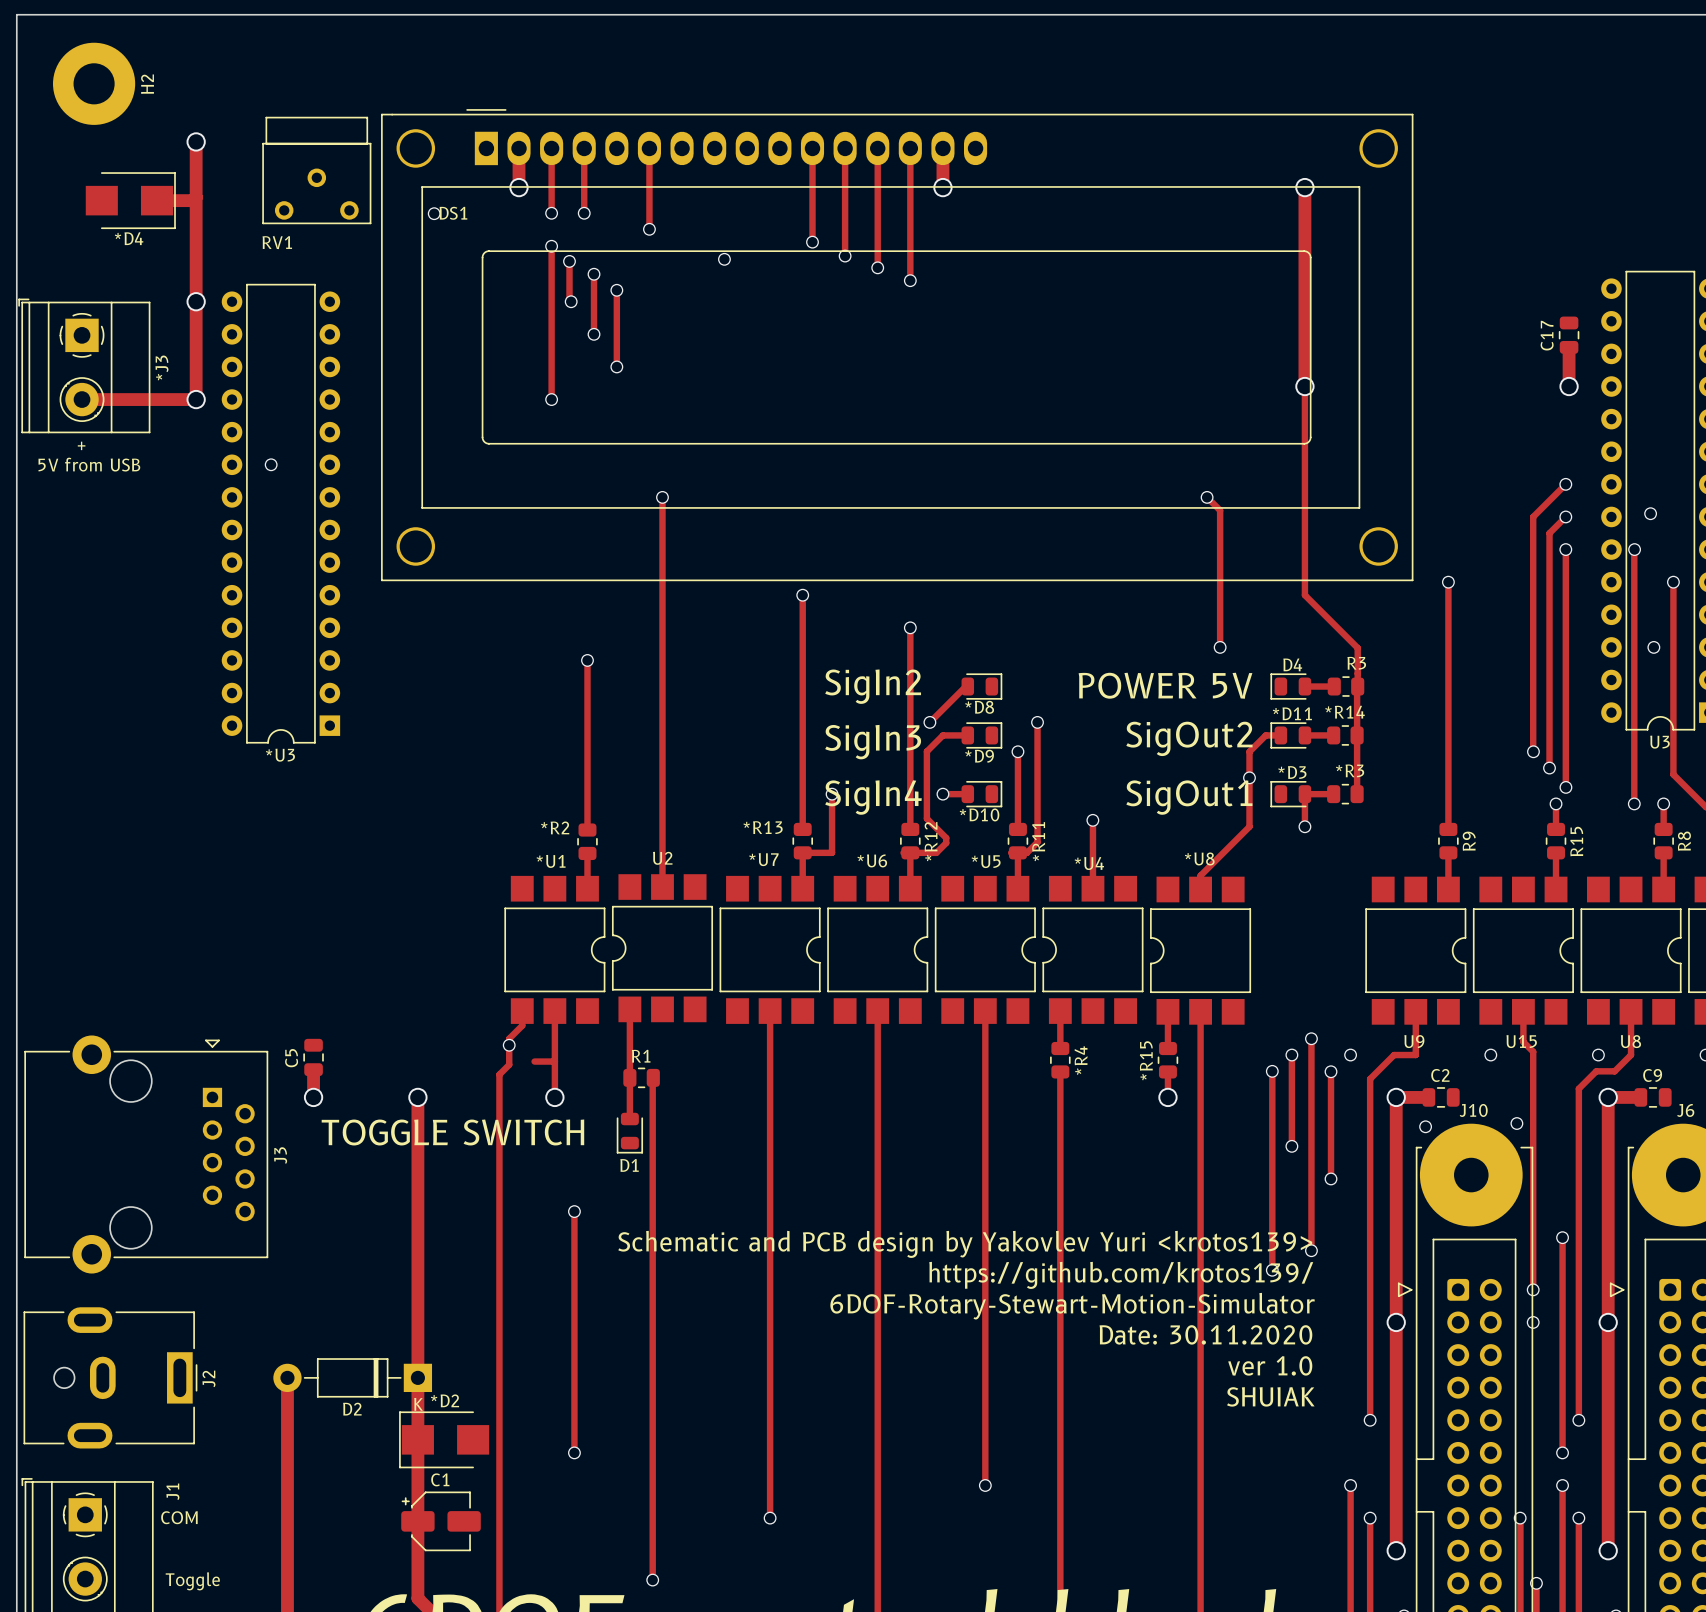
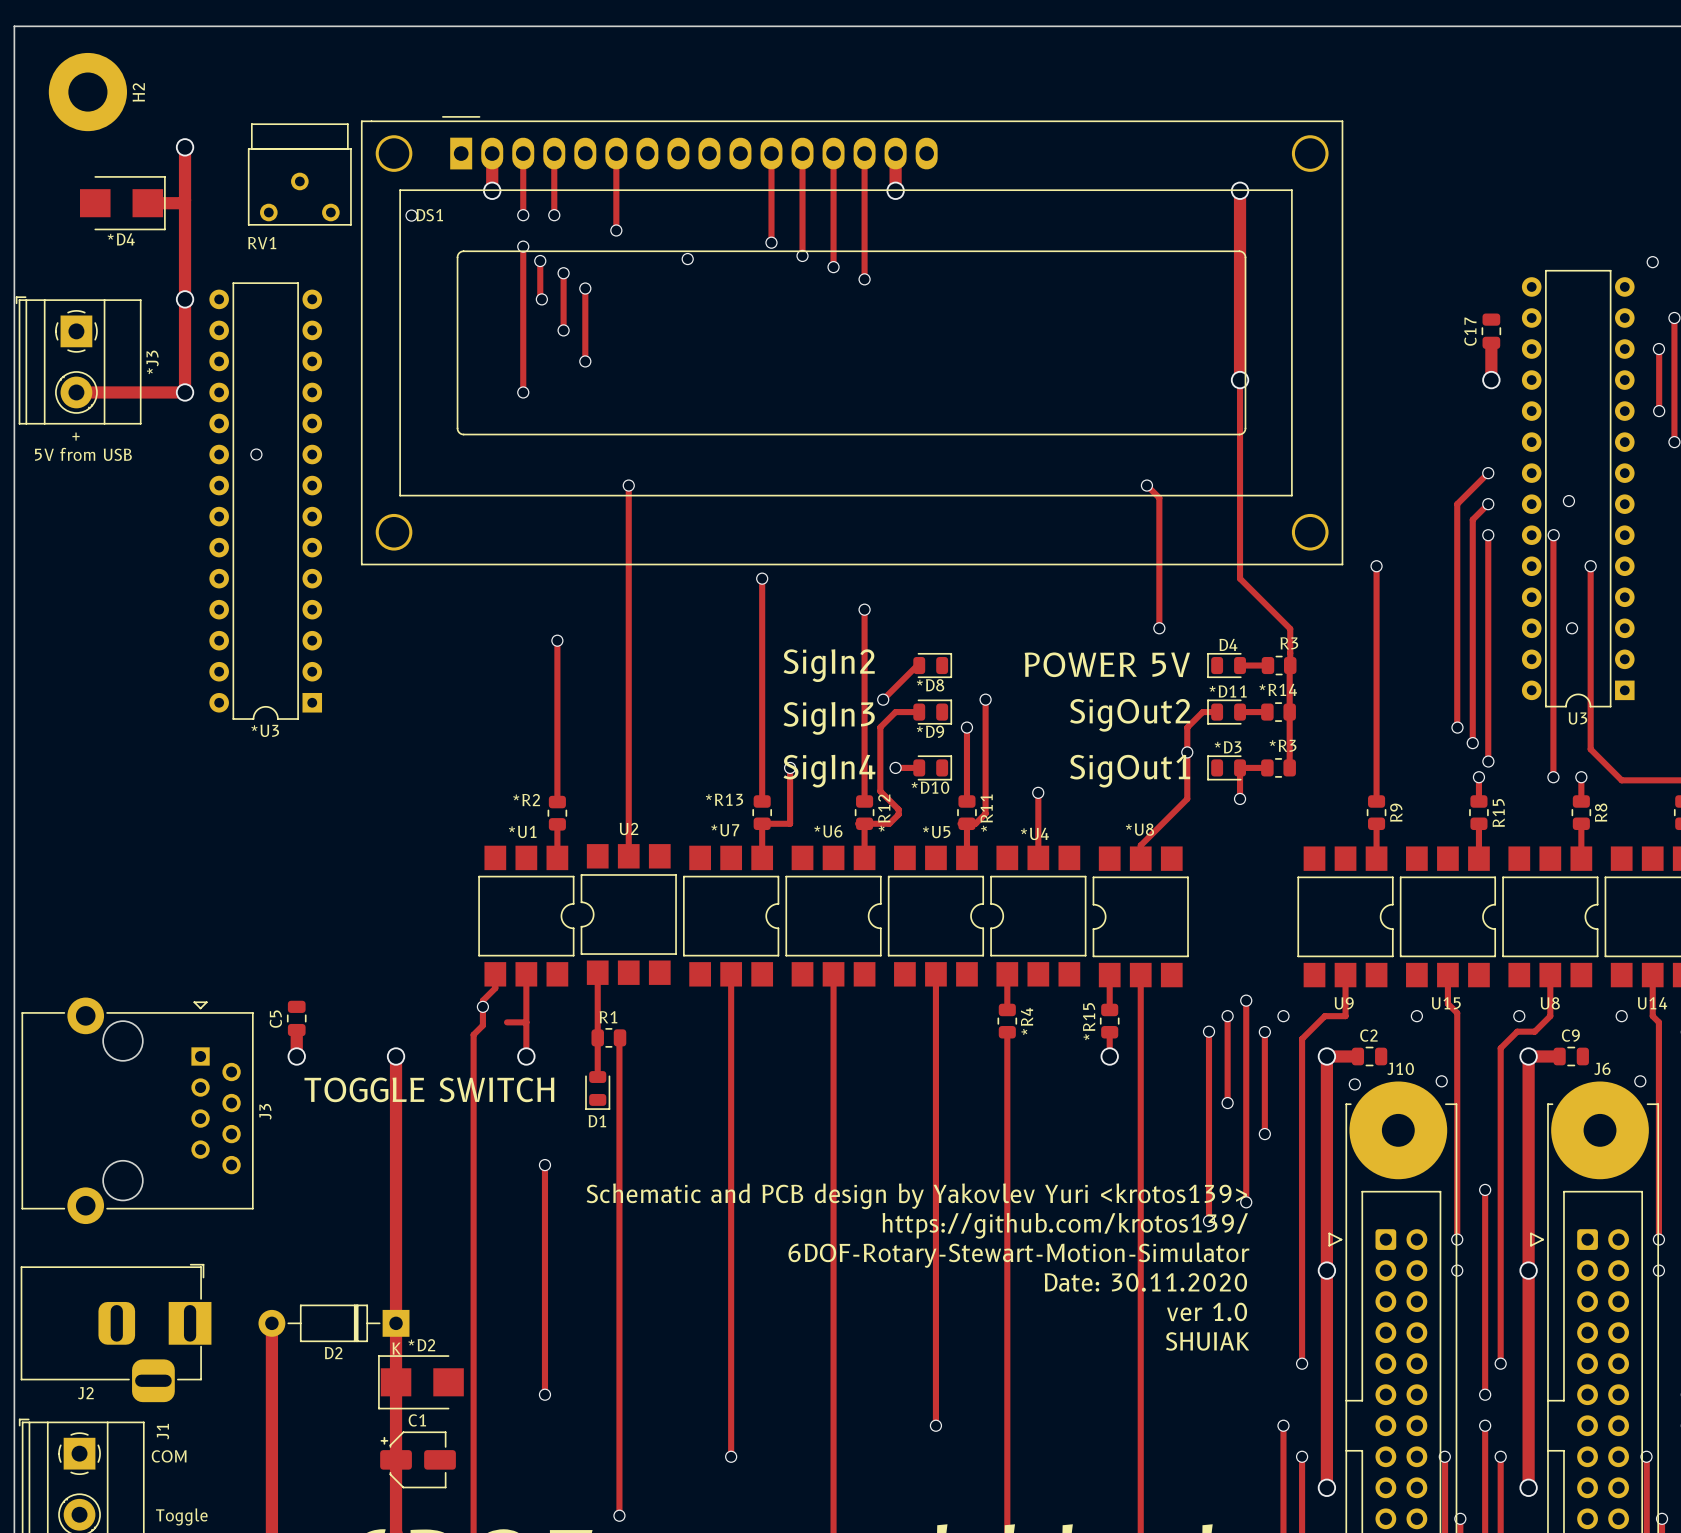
J2 footprint: [23, 1307, 198, 1449] -> [20, 1263, 212, 1403]
J2 name position: J2 (208, 1378) -> J2 (85, 1393)

